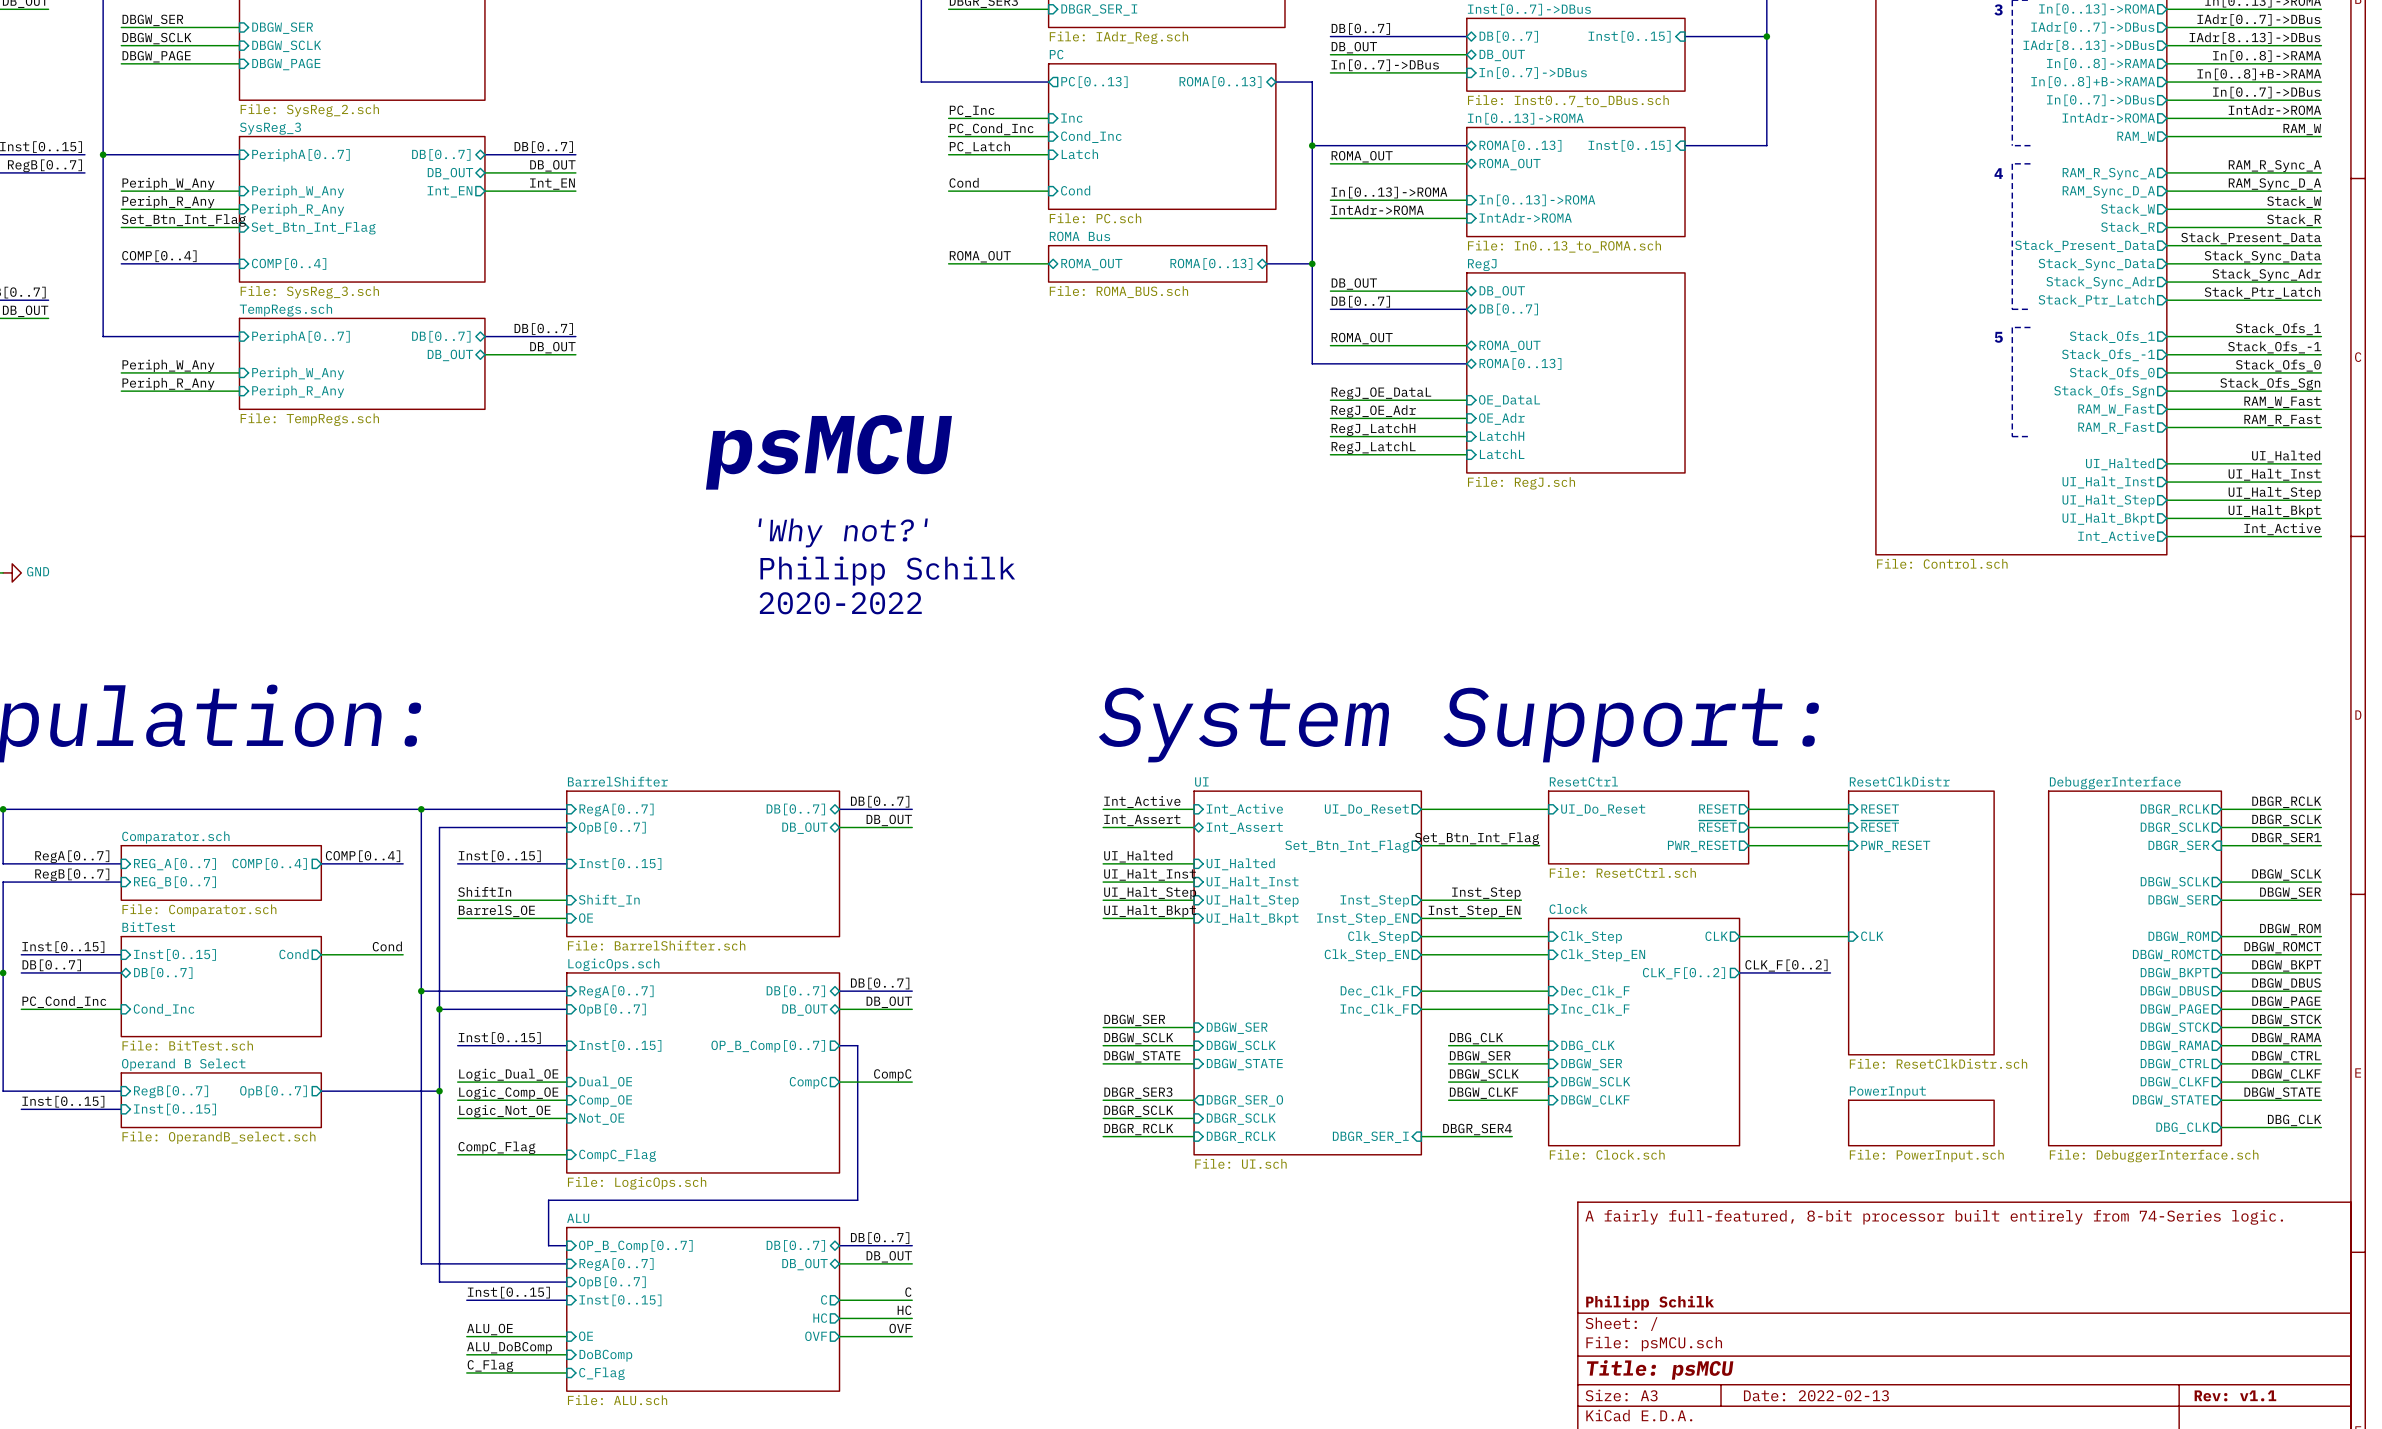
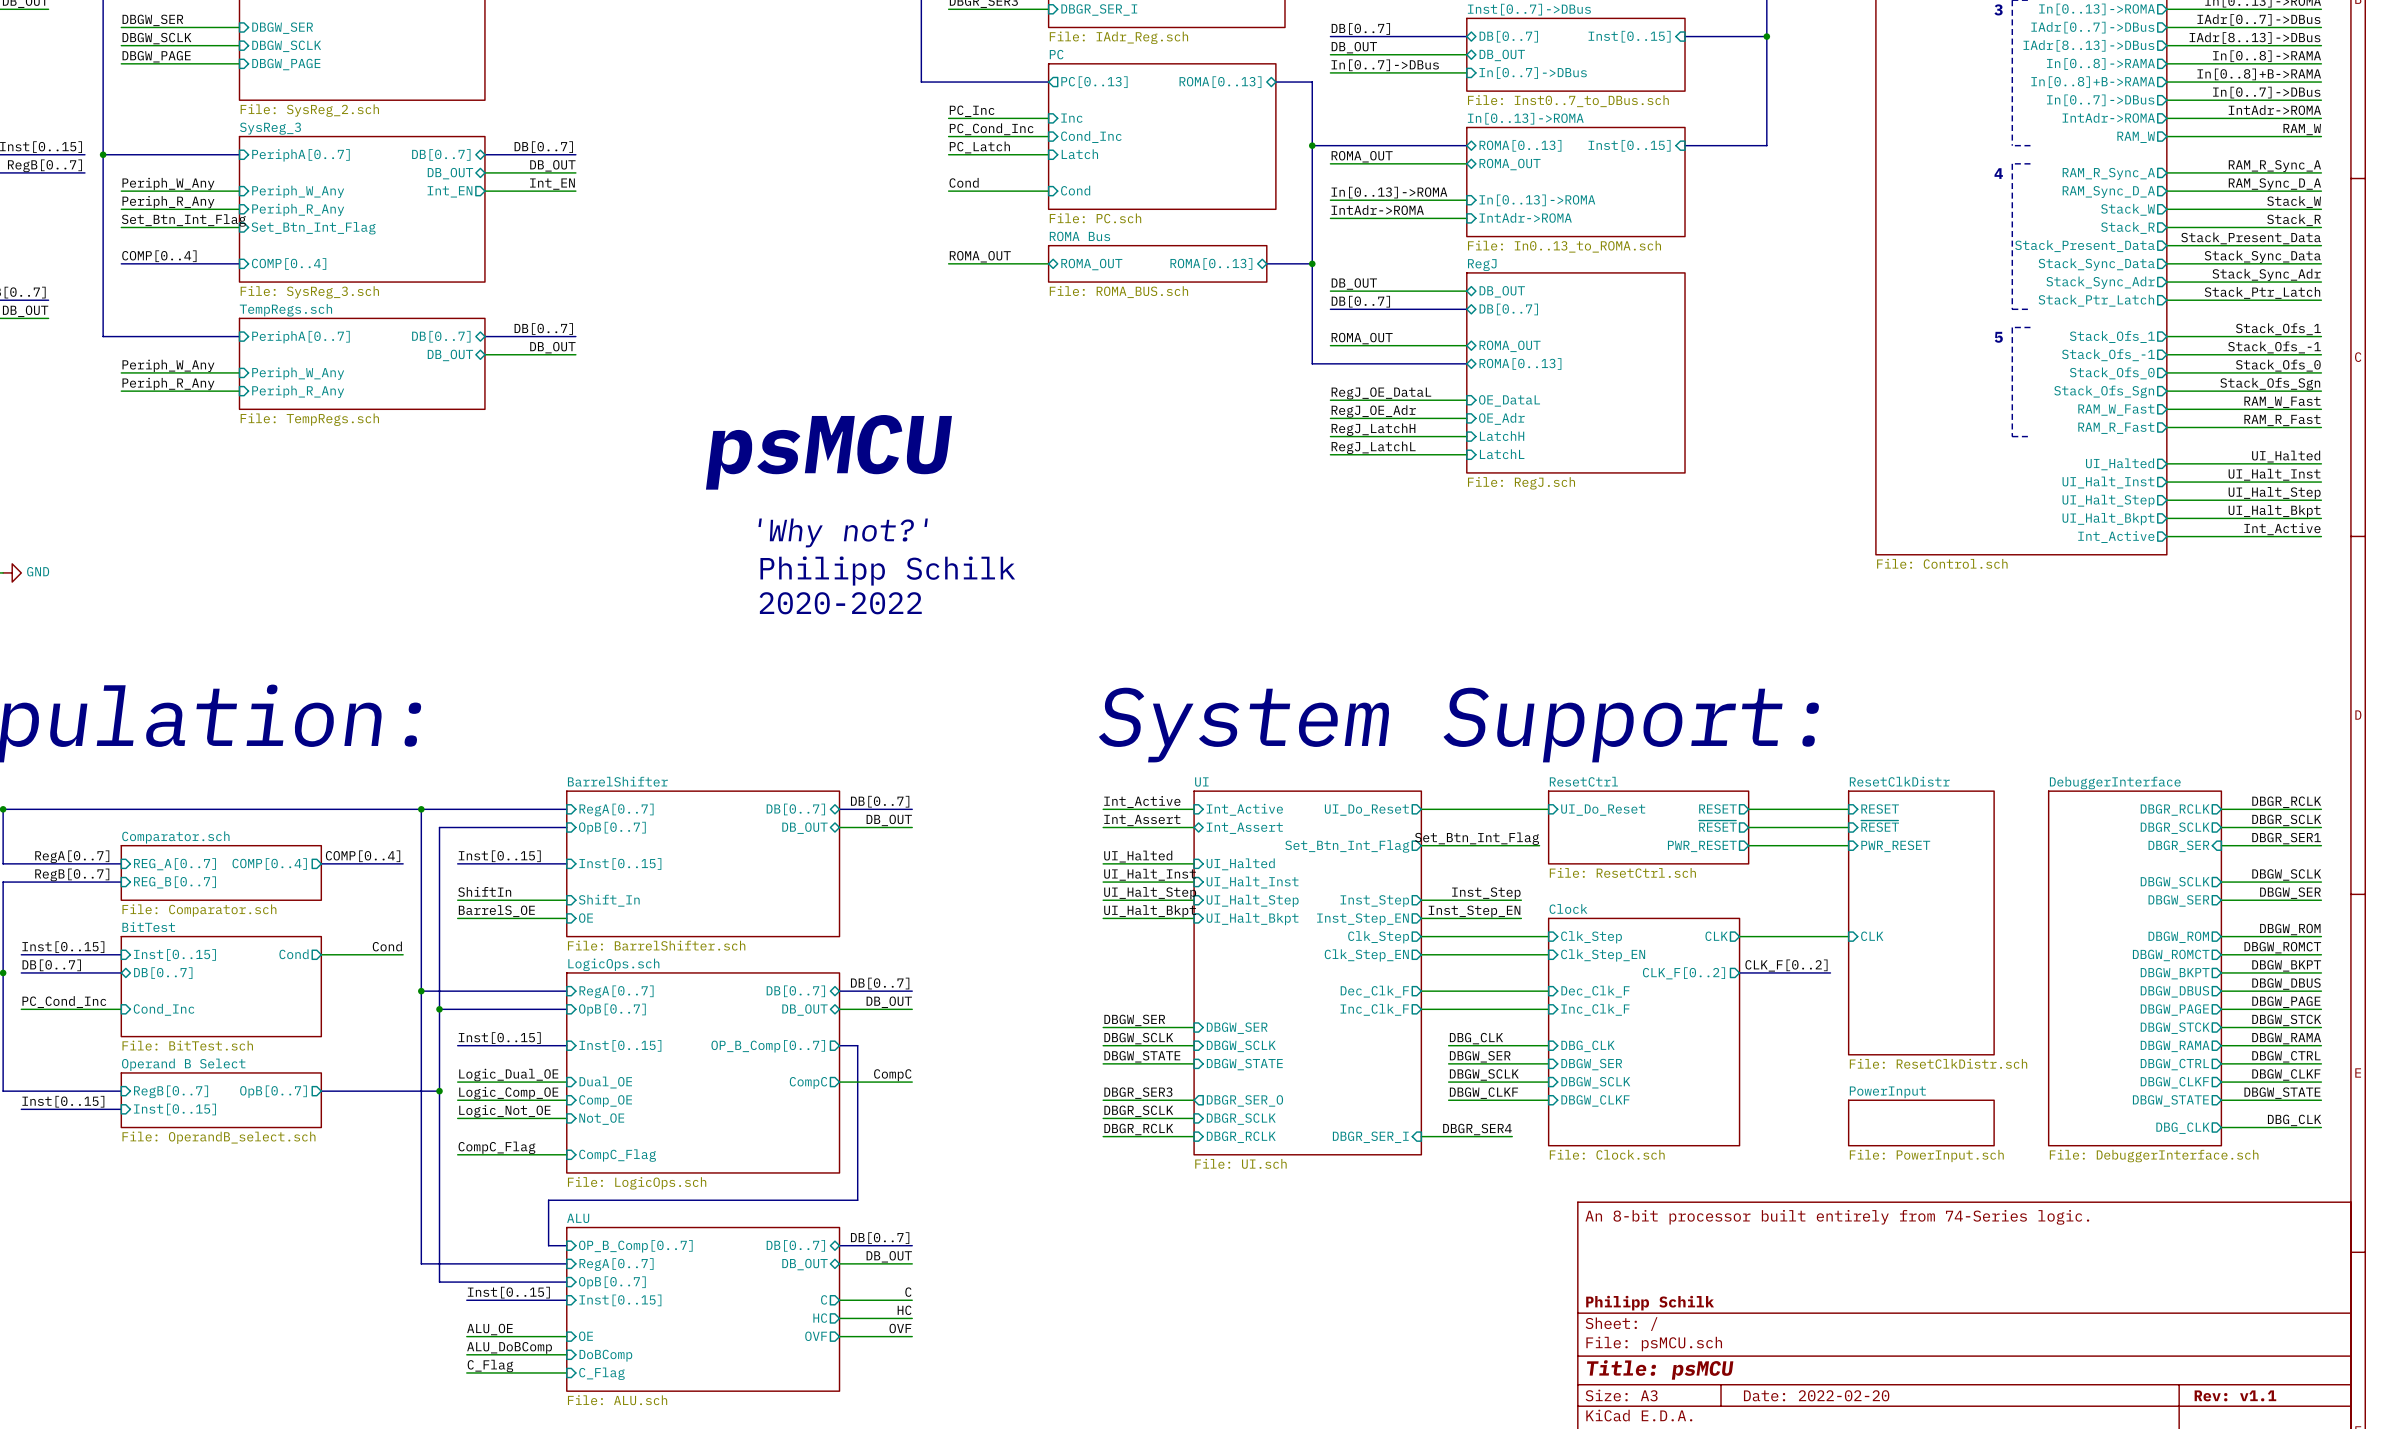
title block: A fairly full-featured, 8-bit processor built entirely from 74-Series logic. (1934, 1217) -> An 8-bit processor built entirely from 74-Series logic. (1837, 1217)
title block: Date: 2022-02-13 (1816, 1395) -> Date: 2022-02-20 (1816, 1395)

